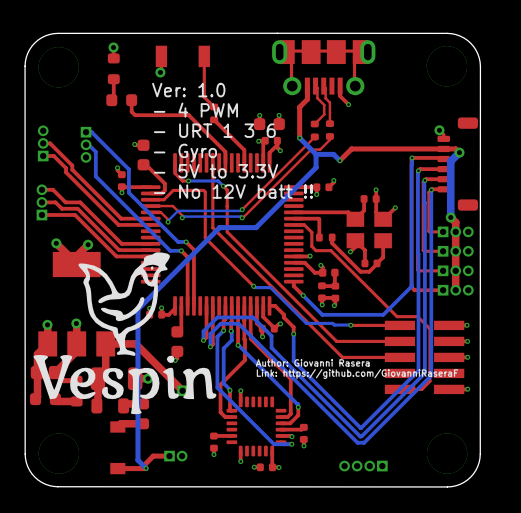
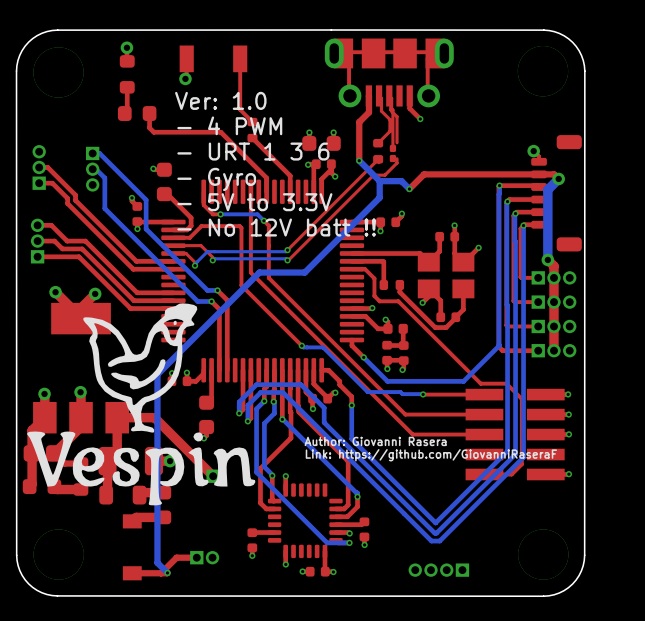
top track: none -> (390, 97) (390, 110) (392, 110) (392, 148)
part footprint: [325, 120, 334, 140] -> [389, 144, 397, 163]

